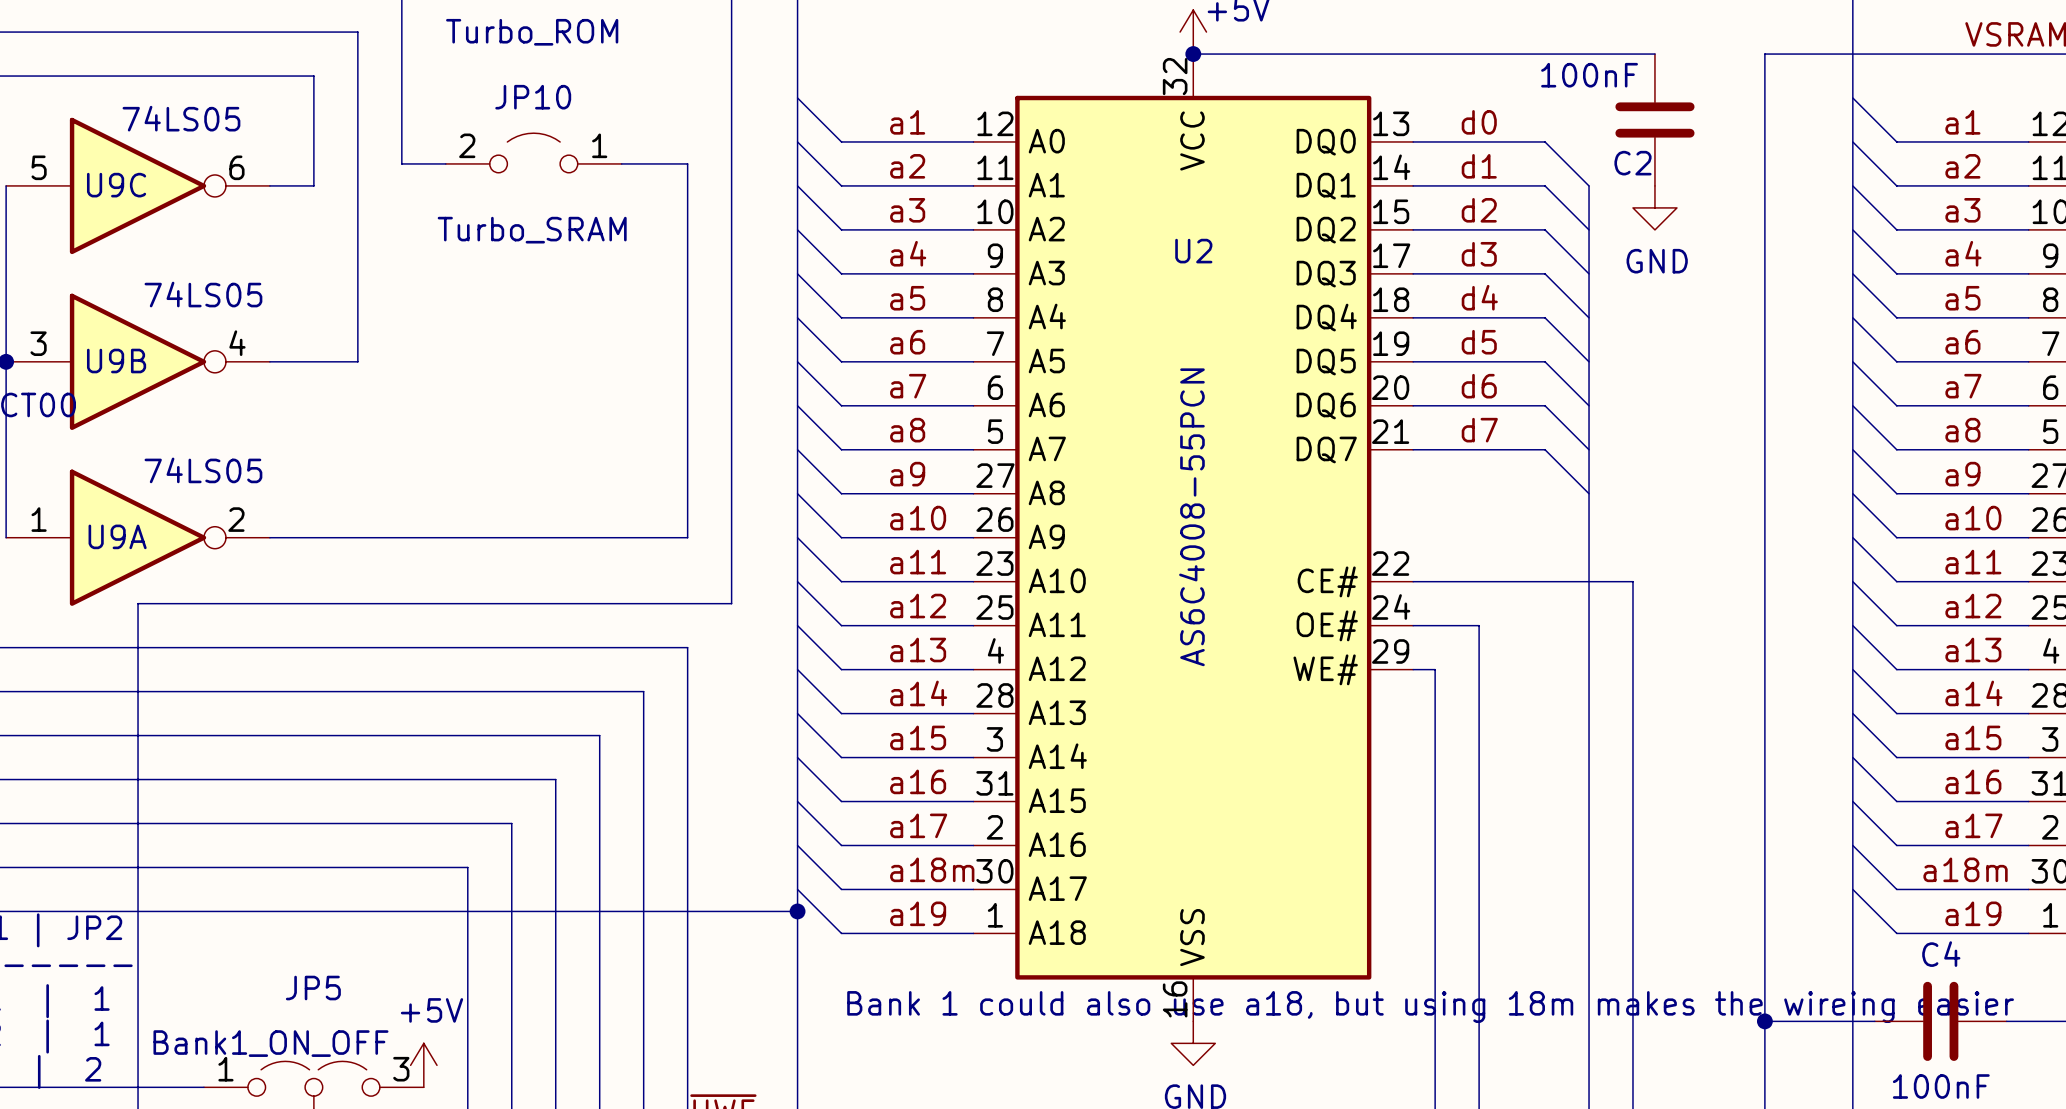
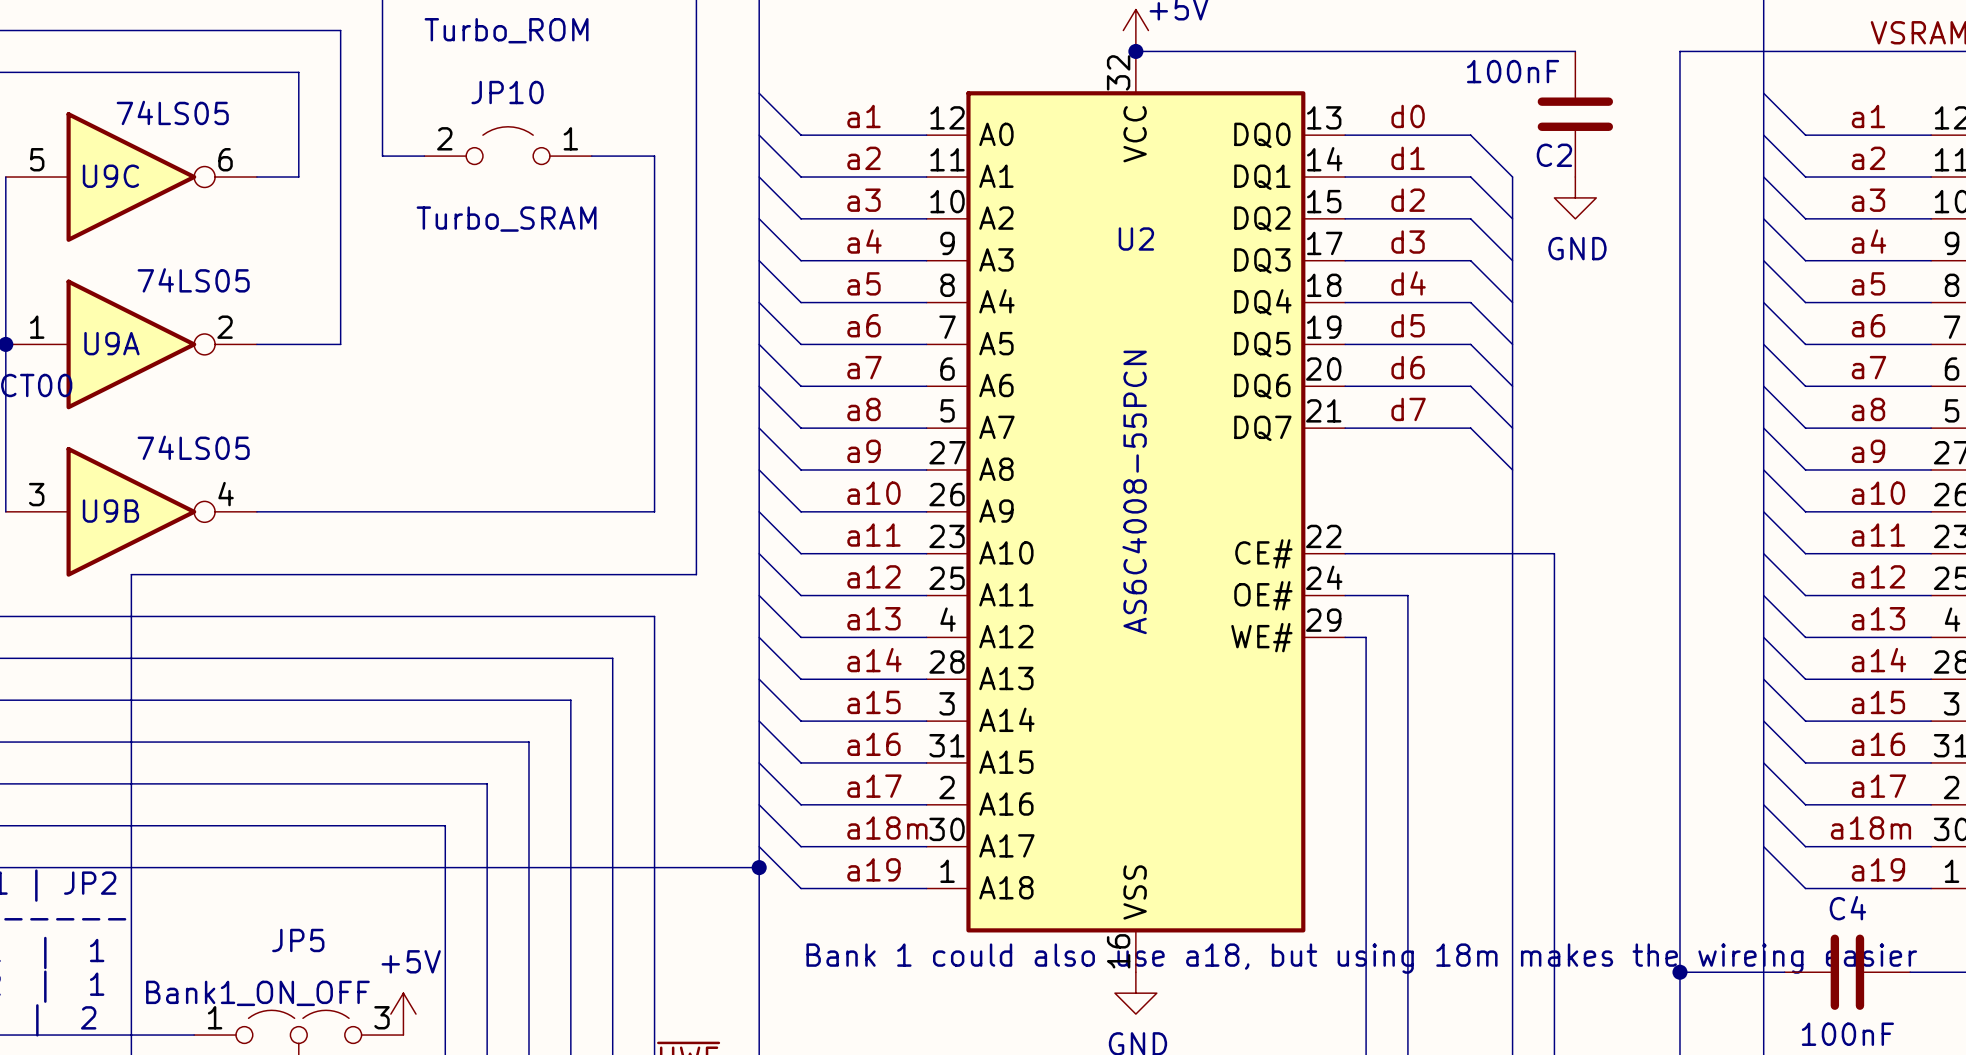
U9B position: (138, 361) -> (131, 511)
U9A position: (138, 537) -> (131, 344)

